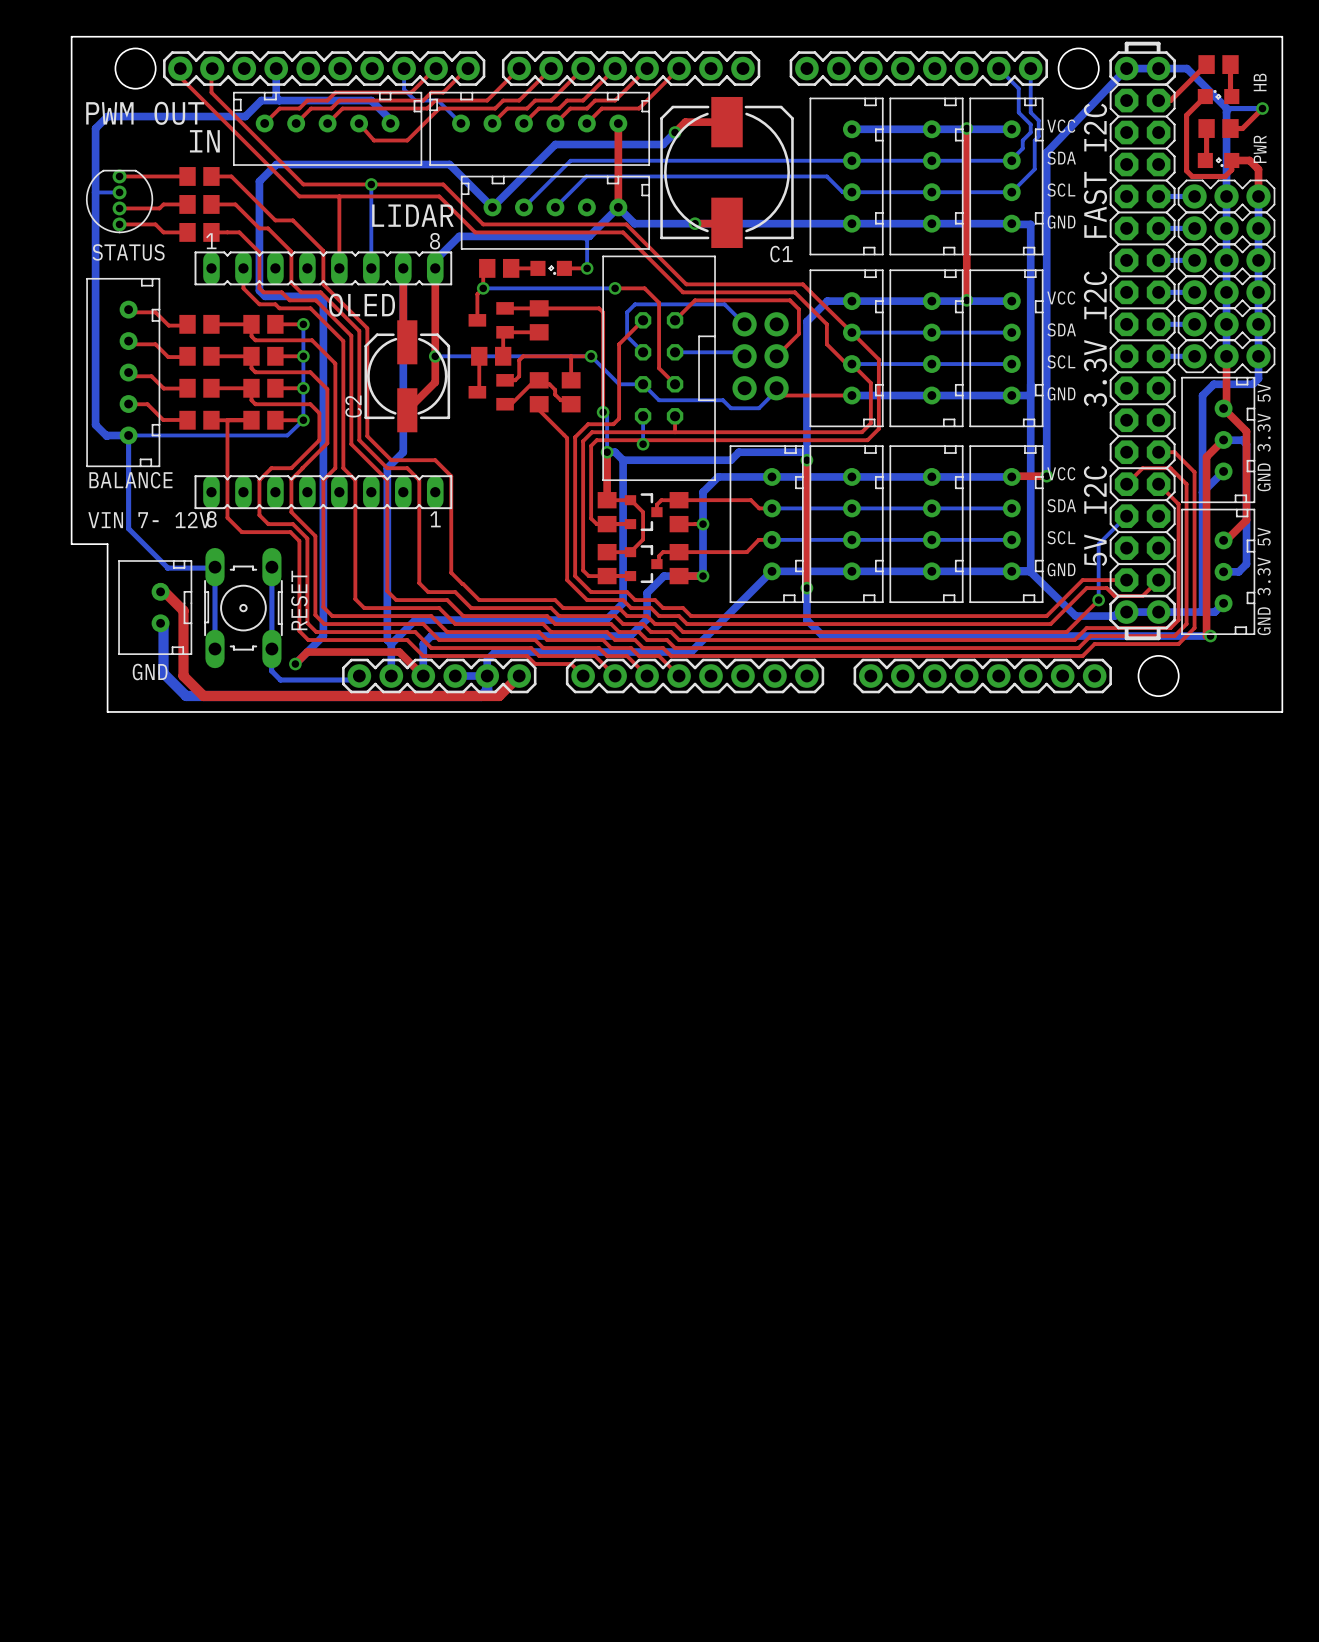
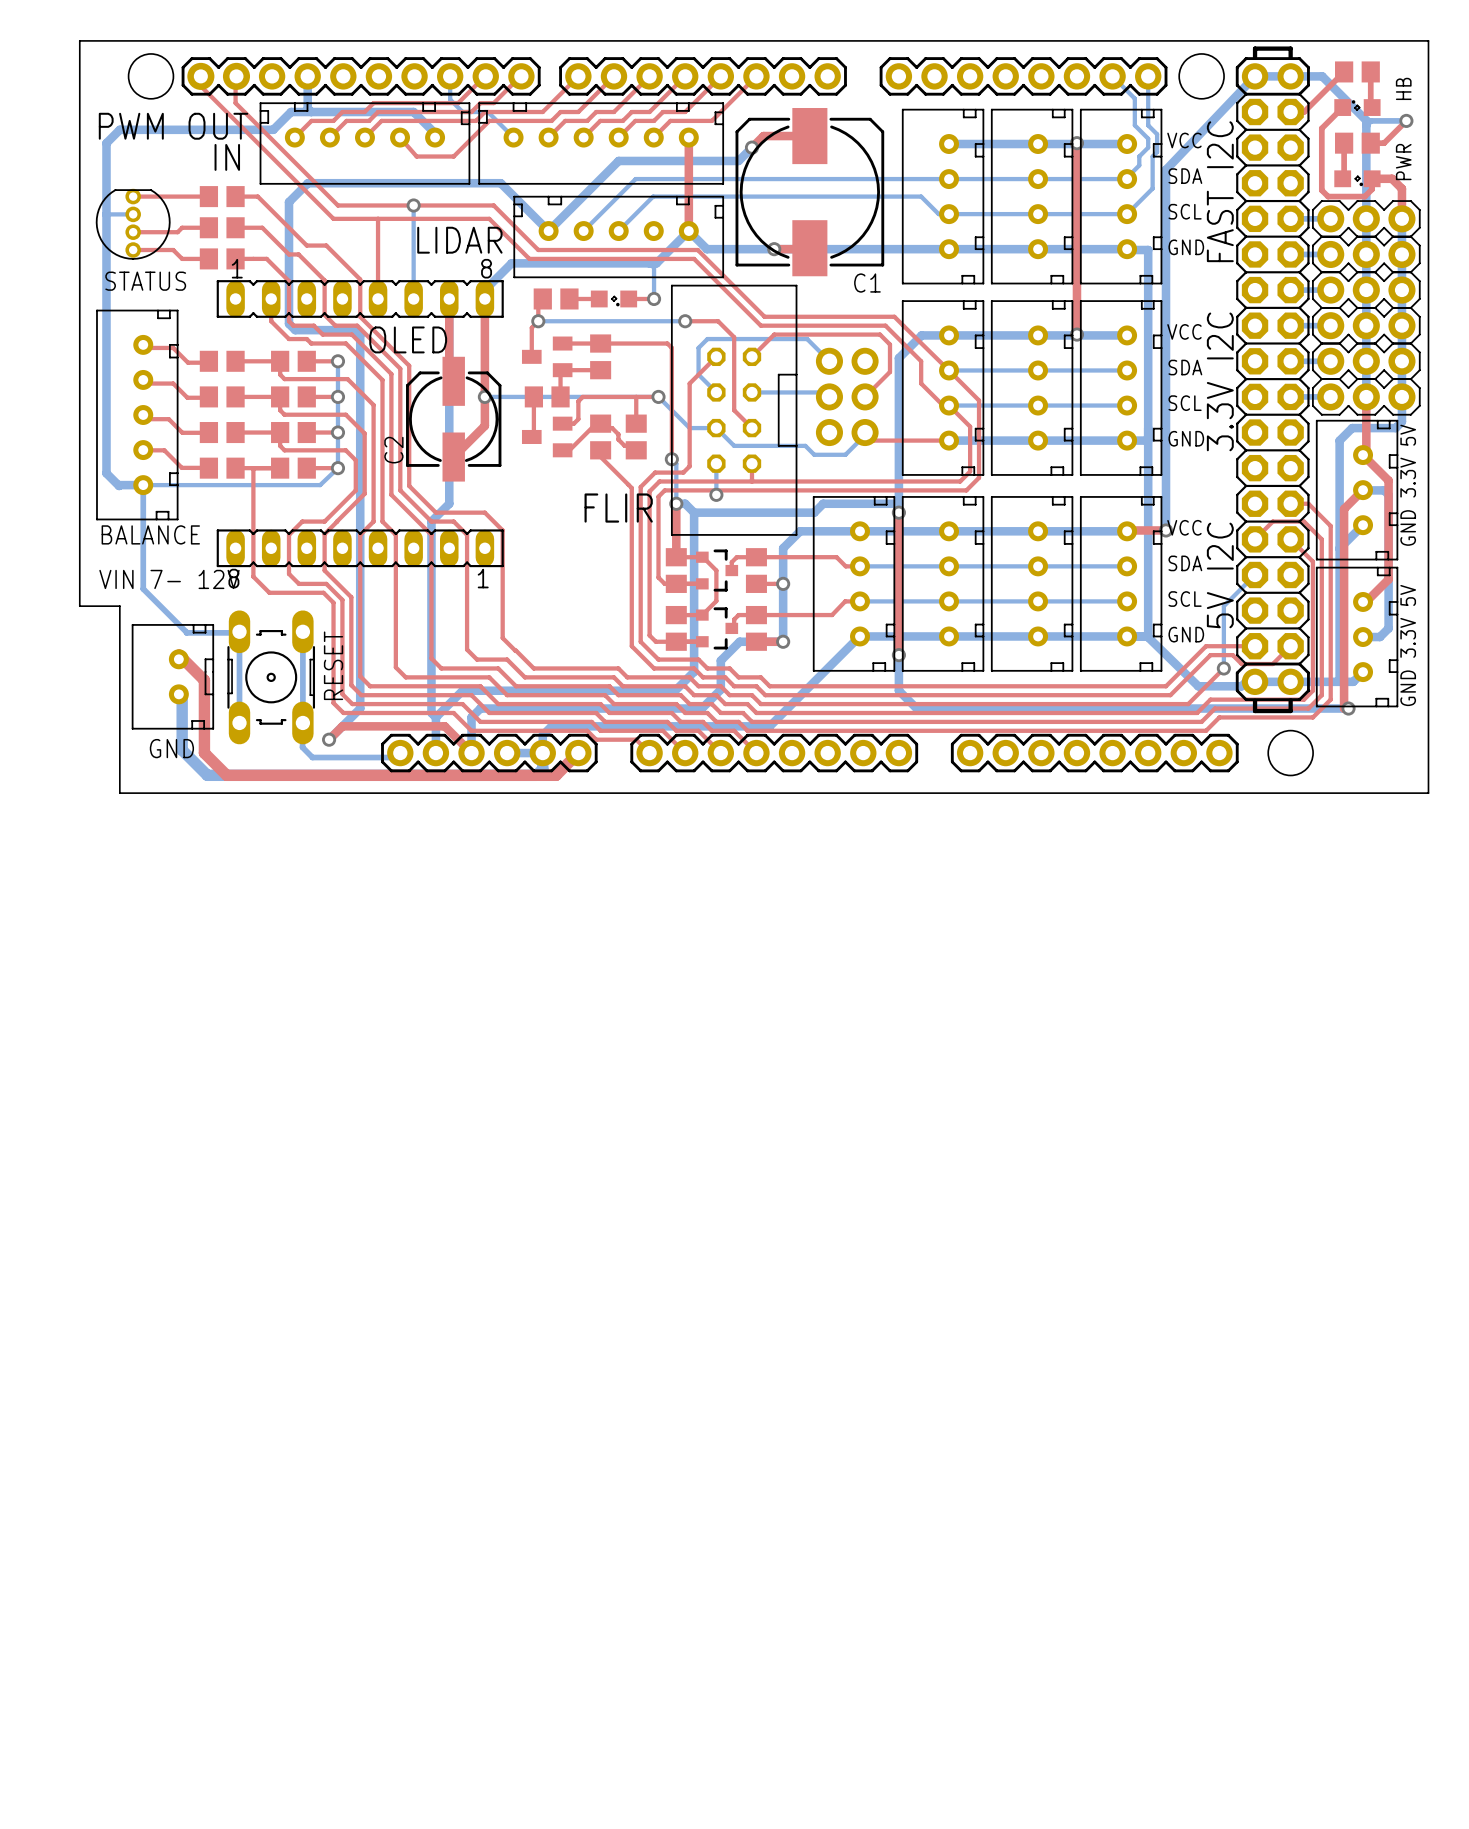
text: none -> FLIR (618, 508)

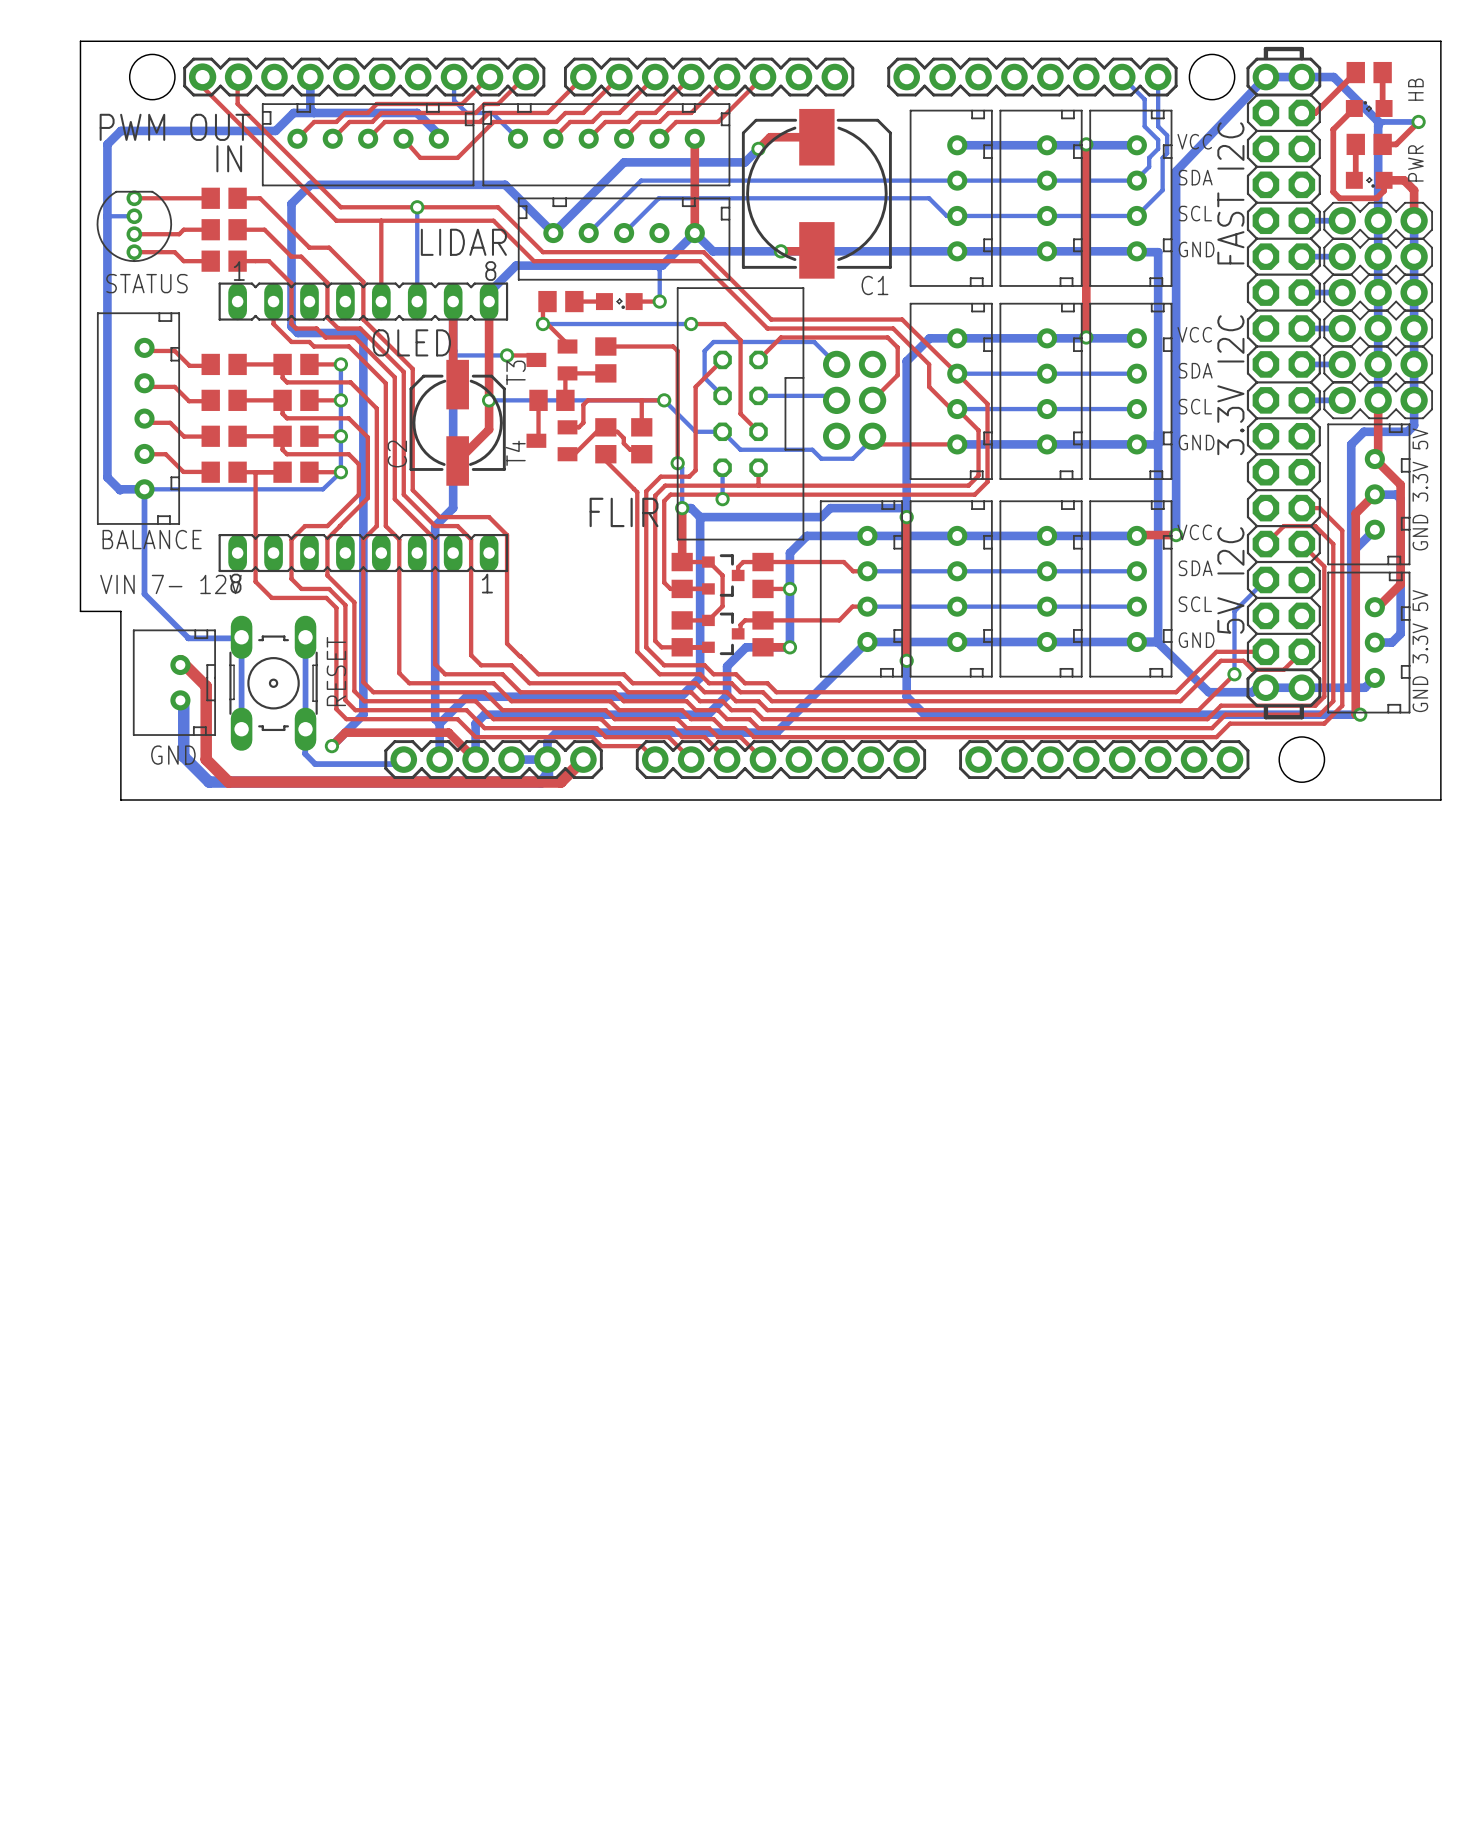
top track: (538, 321) (531, 327) (531, 356) -> (542, 324) (547, 324) (567, 342)
top track: (562, 343) (600, 343) -> none
bottom track: none -> (453, 350) (453, 355) (507, 355)
top track: none -> (507, 355) (536, 355)
via: none -> (507, 355)
T3 name: none -> T3 (516, 372)
T4 name: none -> T4 (515, 453)

